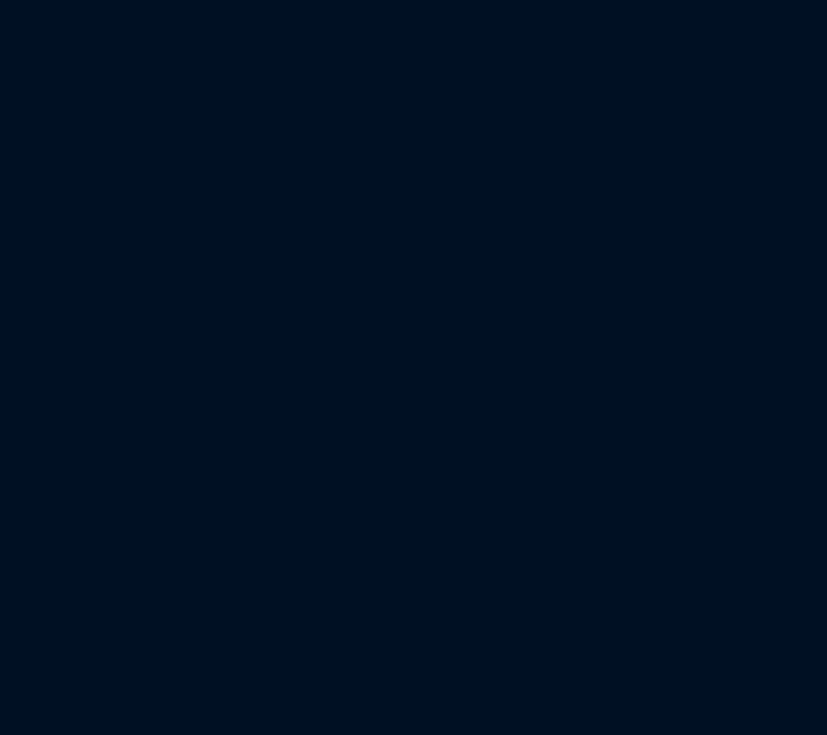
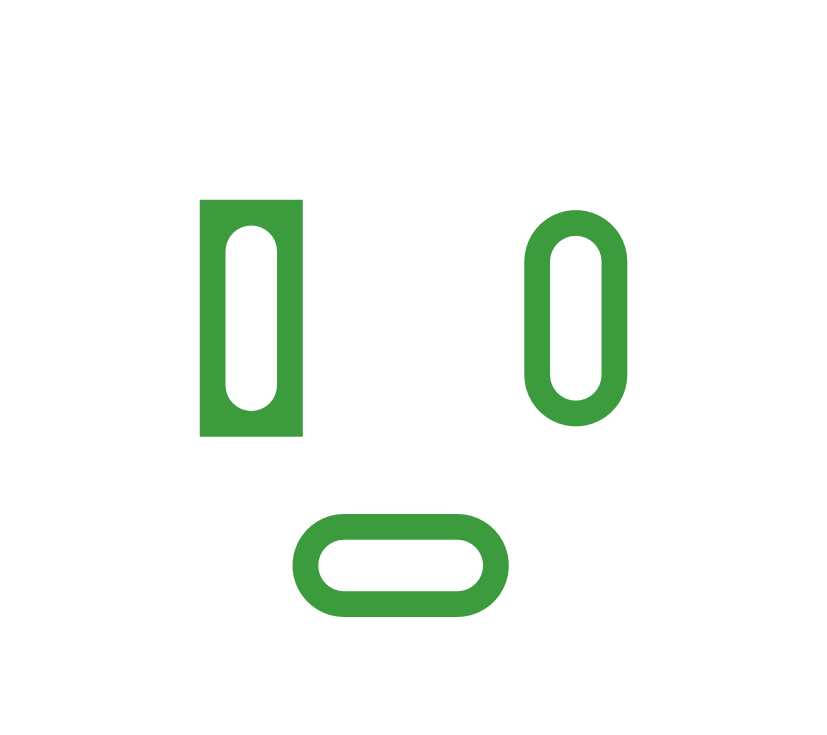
part: none -> (413, 408)

